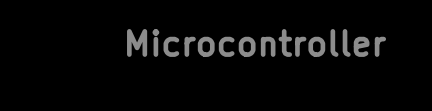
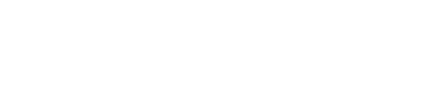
text: Microcontroller (256, 42) -> none

